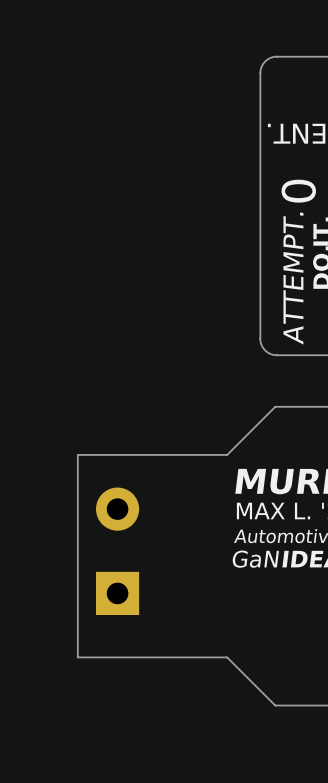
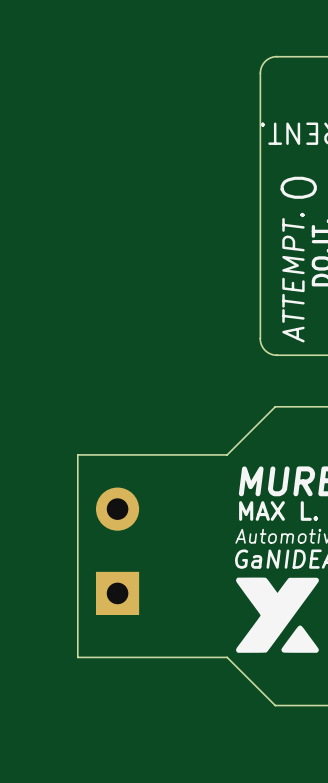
drawing: none -> [236, 577, 319, 653]

